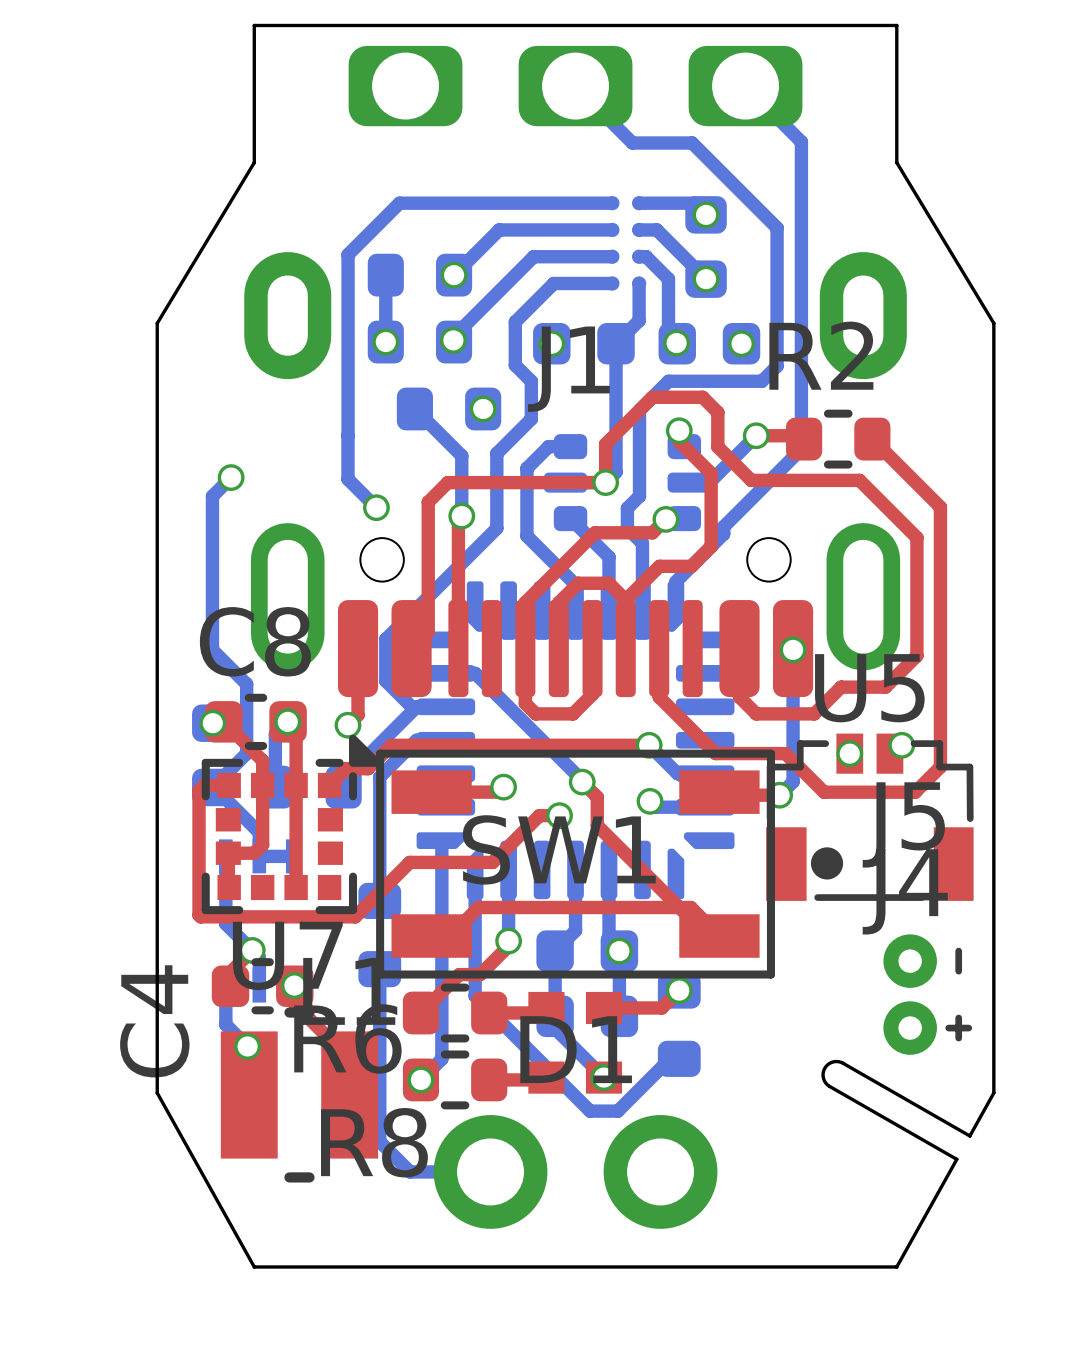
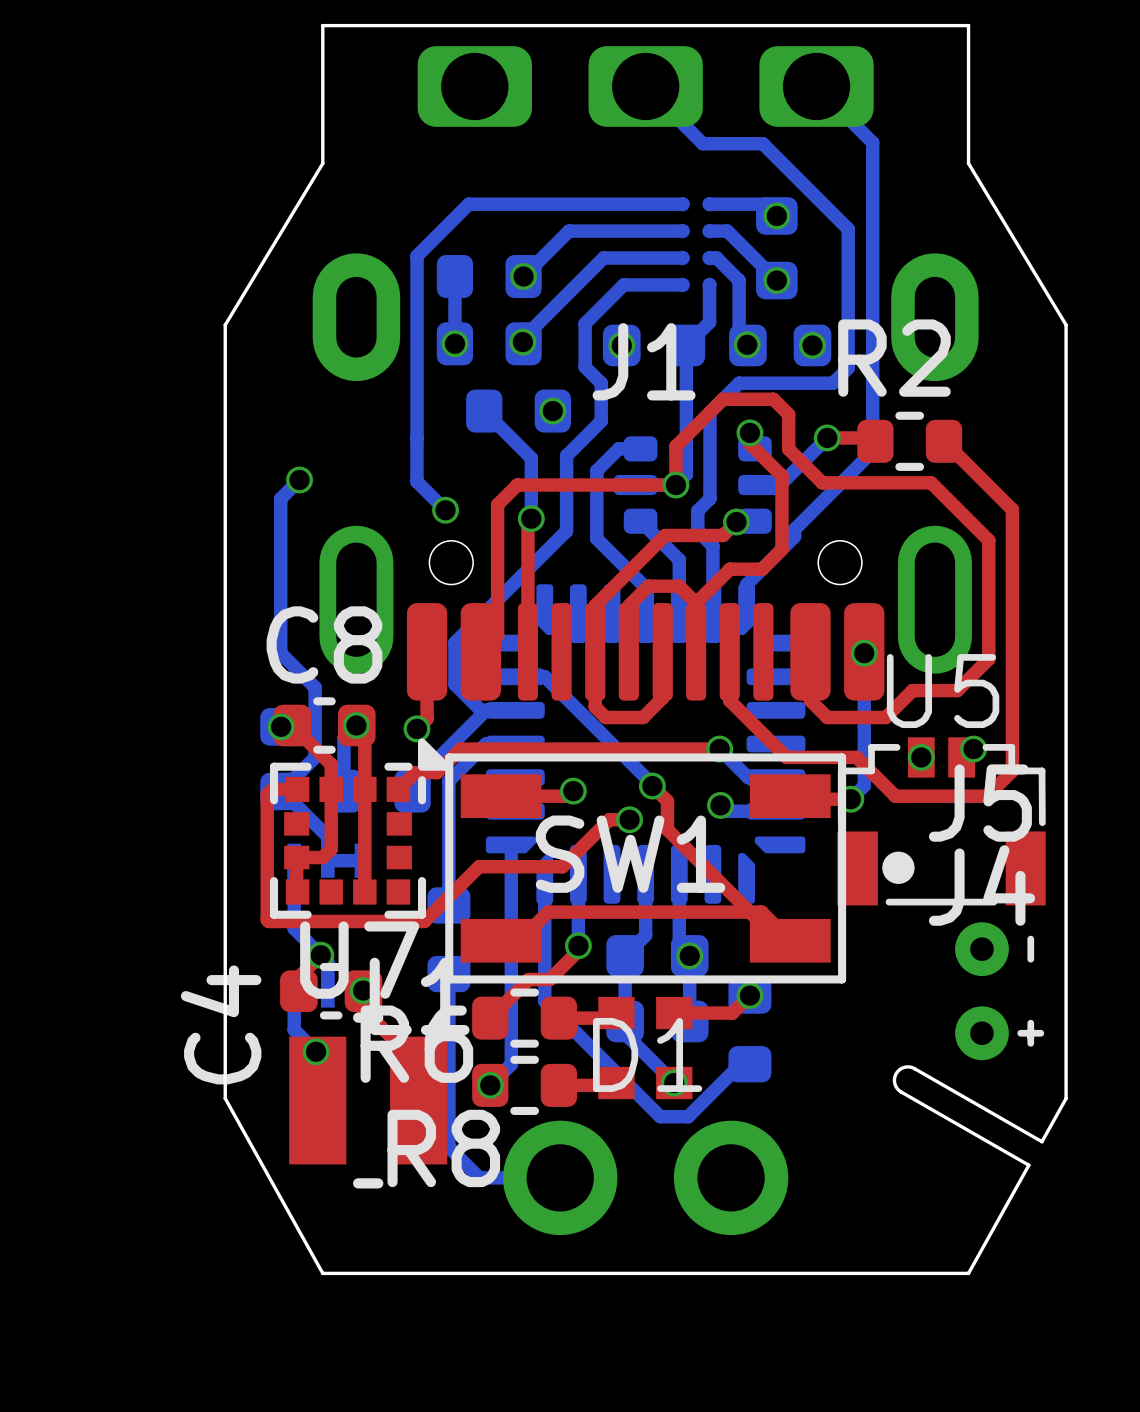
line: (958, 954) (958, 971) -> (1030, 939) (1030, 955)
J5 position: (910, 961) -> (982, 949)

